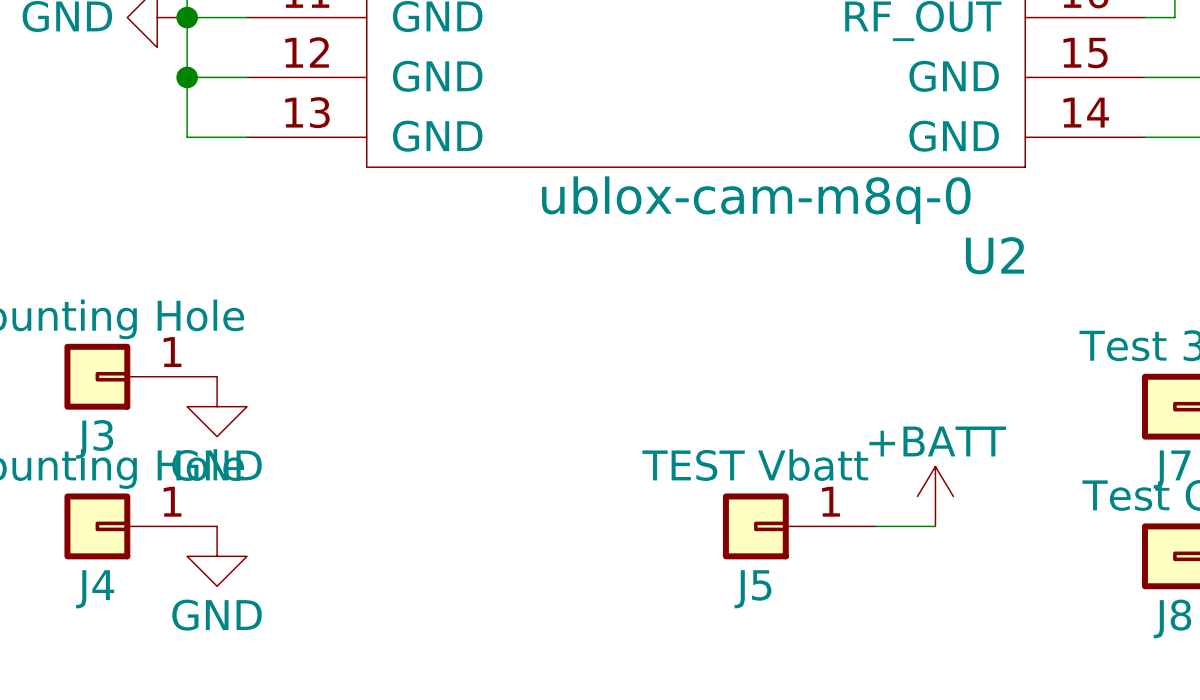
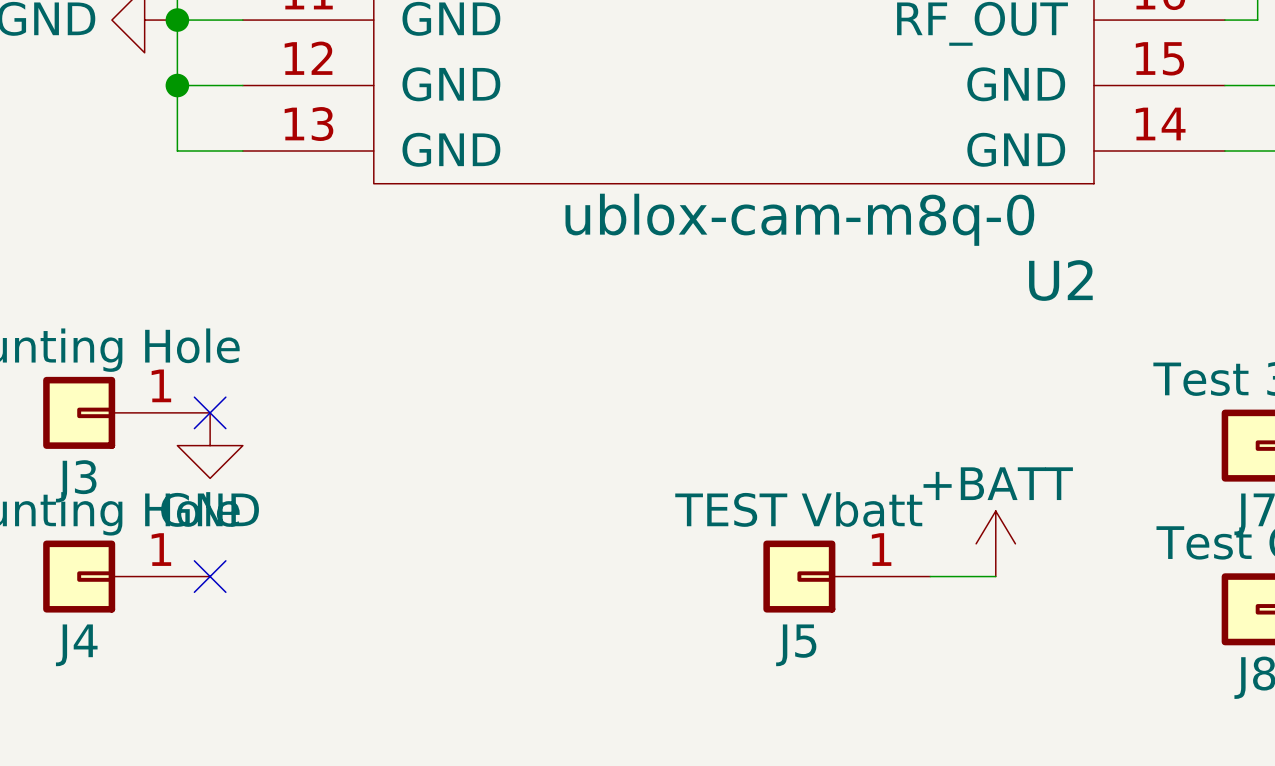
no-connect mark: none -> (210, 412)
no-connect mark: none -> (210, 576)
power symbol: GND (217, 556) -> none

